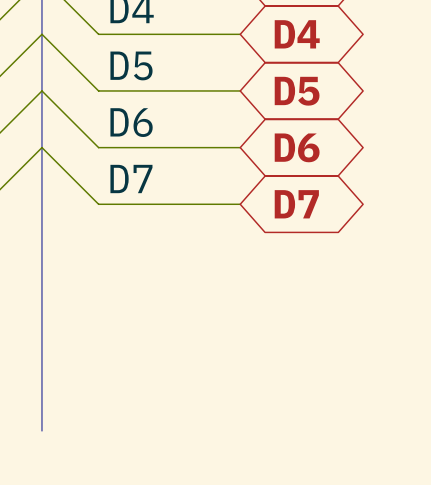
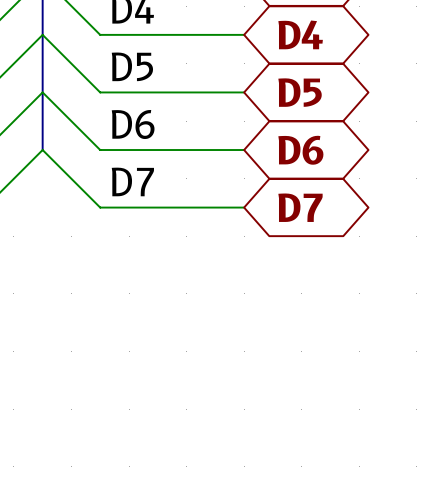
bus: (41, 147) (41, 430) -> none

